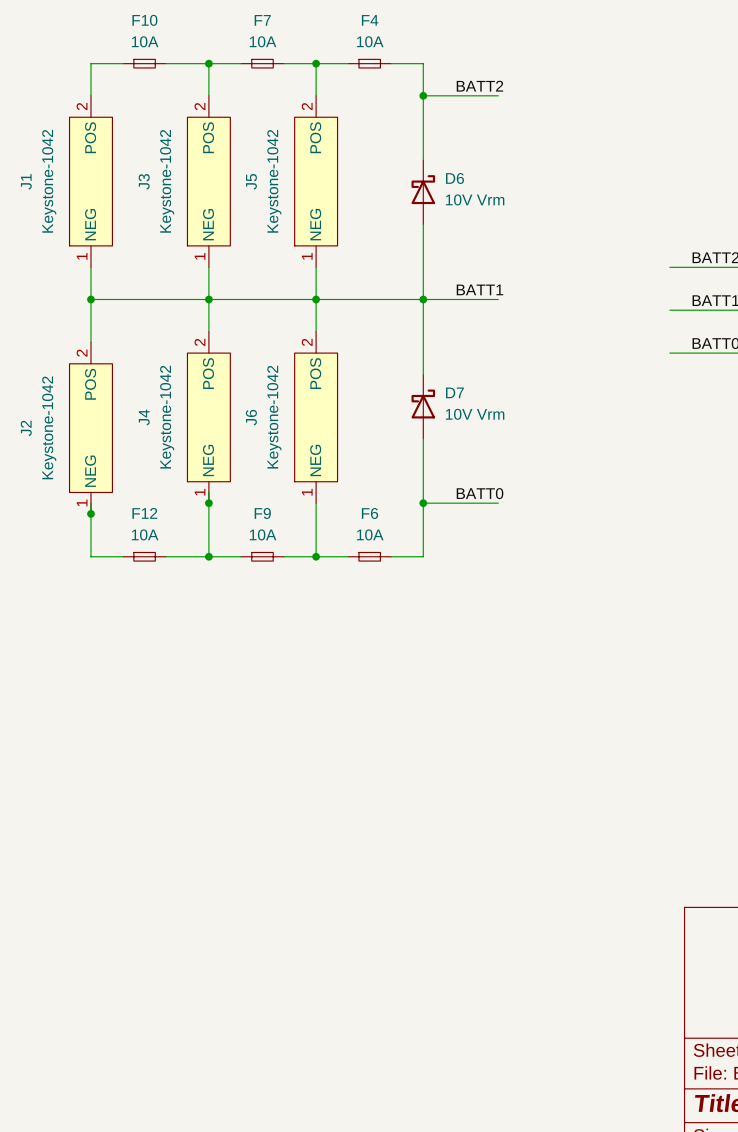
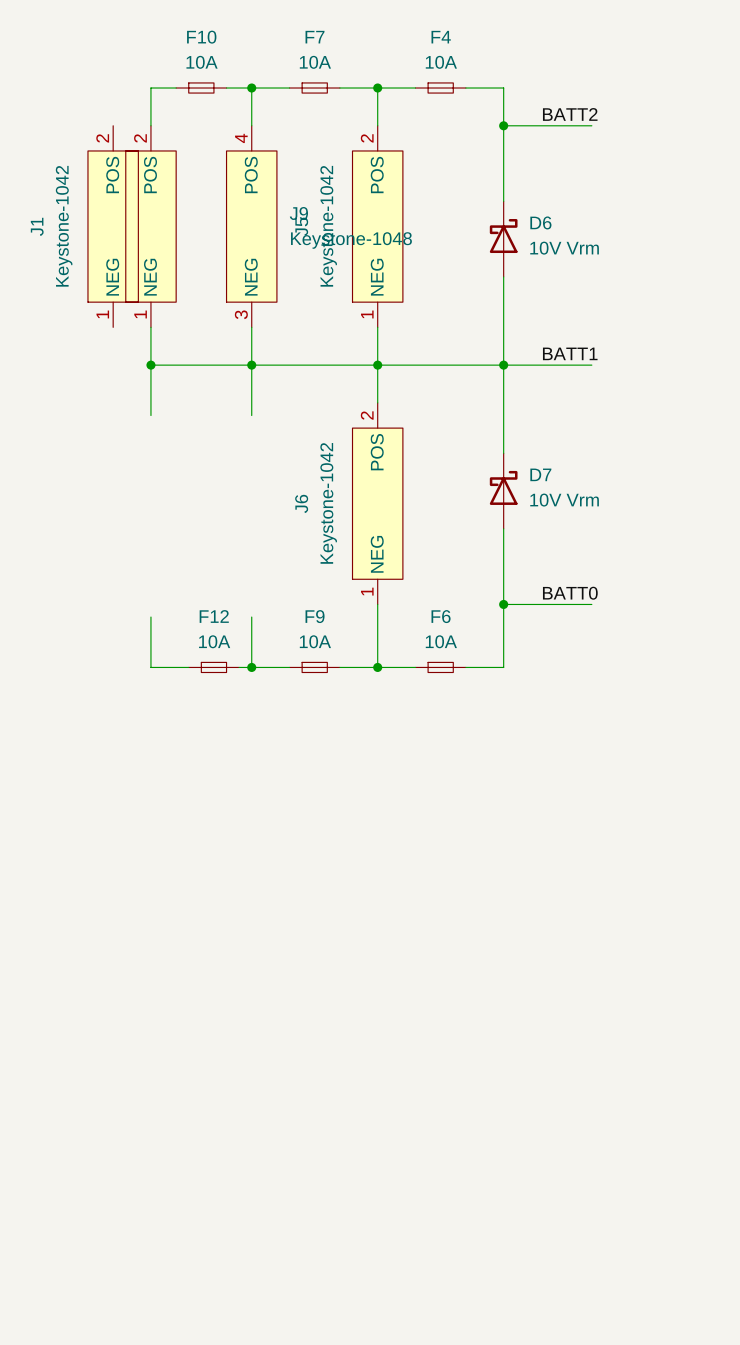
wire: (123, 63) (90, 63) (90, 95) -> none
wire: none -> (176, 88) (150, 88) (150, 125)
F10 position: (144, 63) -> (201, 88)
J9: none -> Keystone-1048 (201, 226)
J3: Keystone-1042 (208, 181) -> none
wire: (90, 267) (90, 342) -> (150, 327) (150, 415)
wire: (90, 299) (123, 299) -> none
junction position: (90, 299) -> (150, 365)
J4: Keystone-1042 (208, 417) -> none
J2: Keystone-1042 (90, 428) -> none
wire: (208, 492) (208, 513) -> none
wire: (90, 503) (90, 556) (123, 556) -> none
junction: (208, 503) -> none
junction: (90, 513) -> none
wire: none -> (150, 617) (150, 667) (188, 667)
F12 position: (144, 556) -> (213, 667)

